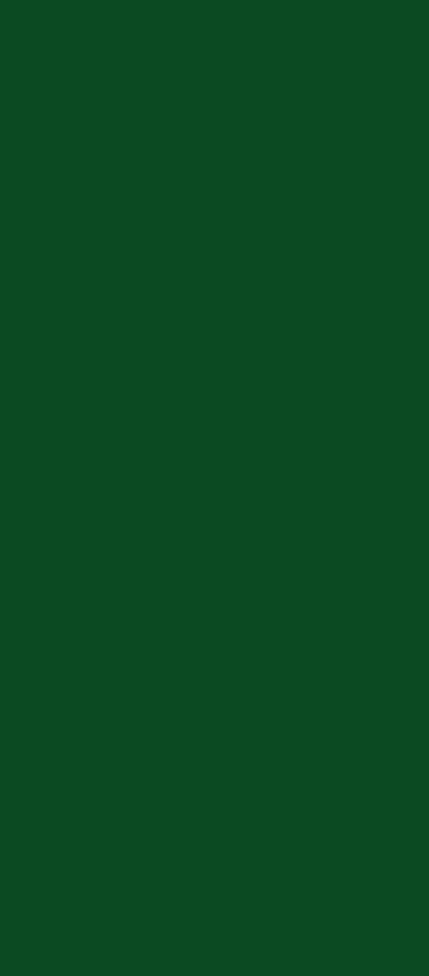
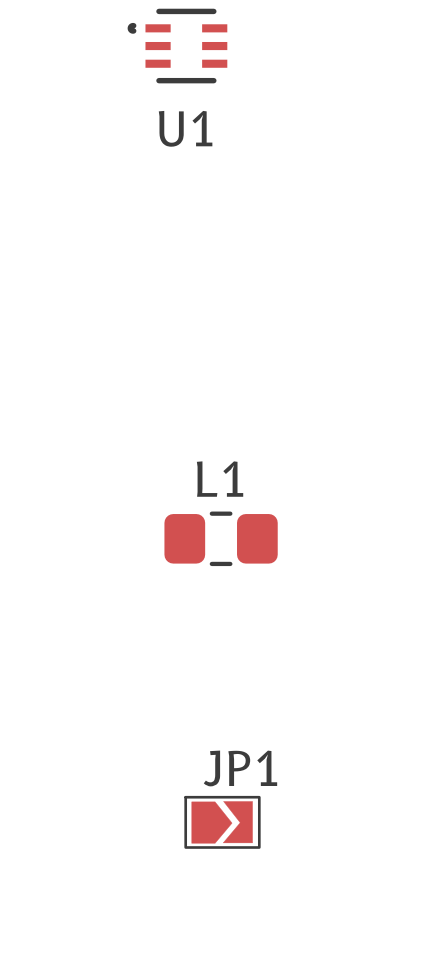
U1: none -> (177, 46)
L1: none -> (221, 538)
JP1: none -> (222, 822)

